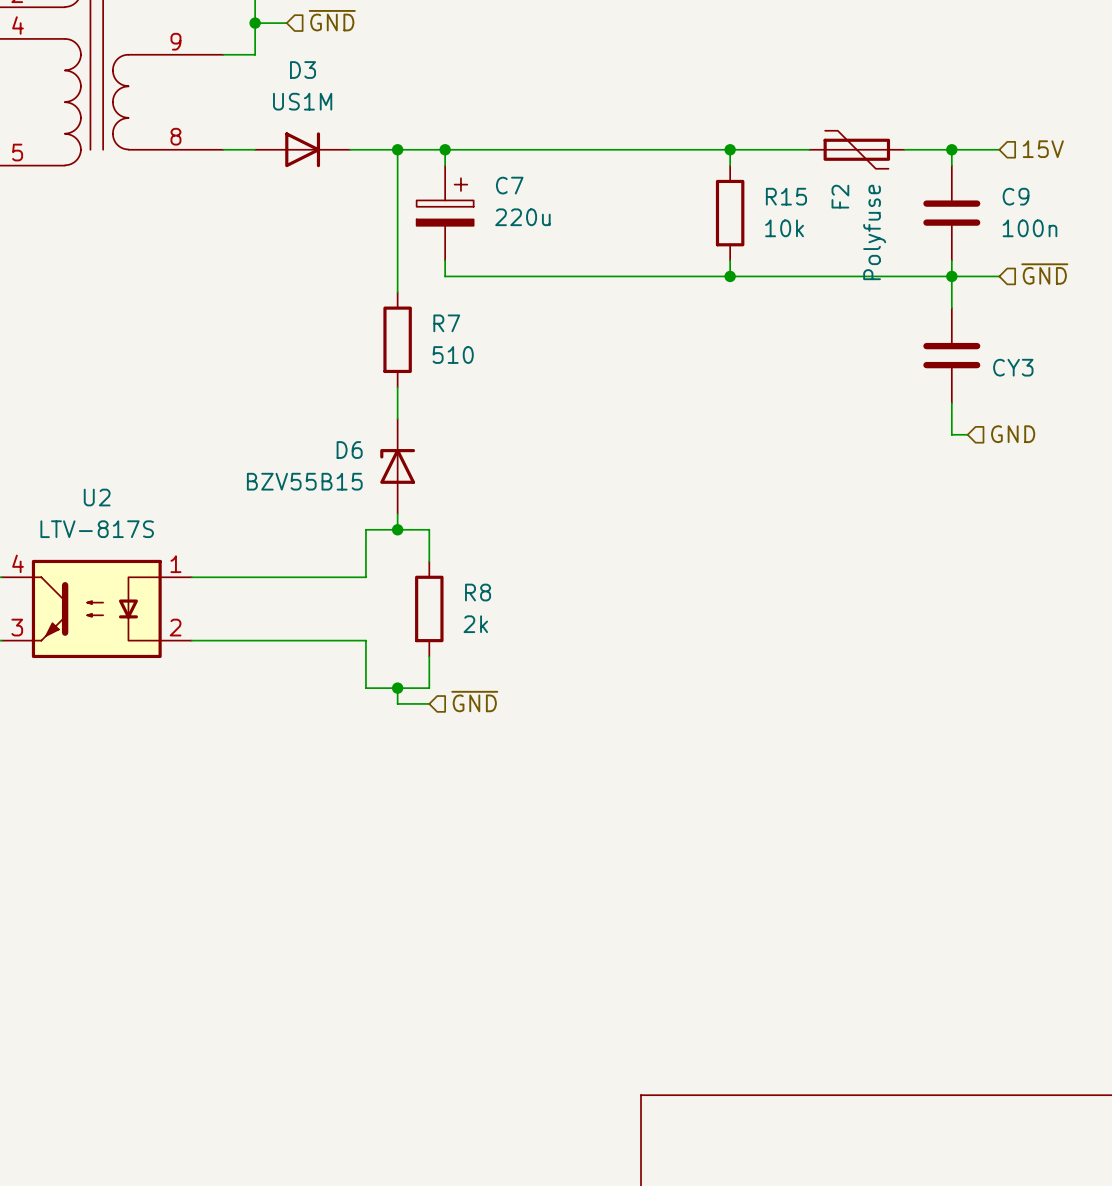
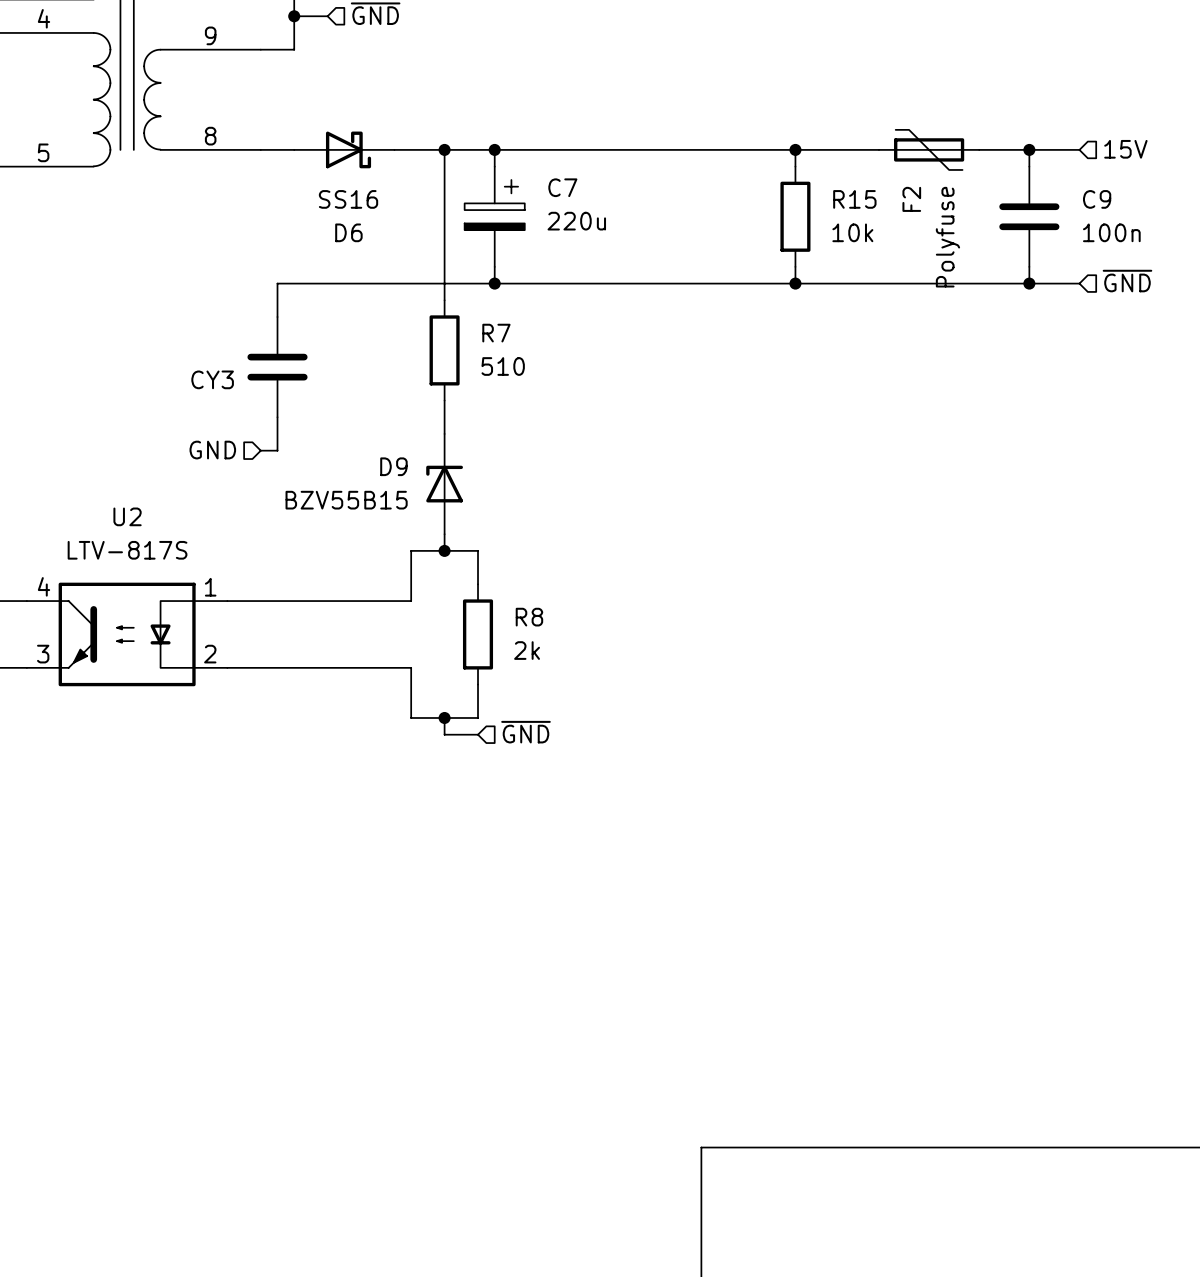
D3: US1M (302, 149) -> none
D6: none -> SS16 (344, 149)
wire: none -> (494, 283) (277, 283) (277, 317)
junction: none -> (494, 283)
wire: (951, 276) (951, 308) -> none
CY3 position: (951, 355) -> (277, 367)
CY3 name position: CY3 (1013, 367) -> CY3 (212, 379)
wire: none -> (277, 417) (277, 450) (260, 450)
wire: (951, 403) (951, 434) (967, 434) -> none
hierarchical label: none -> GND (212, 450)
hierarchical label: GND (1013, 434) -> none
D6 name: D6 (349, 450) -> D9 (393, 466)

